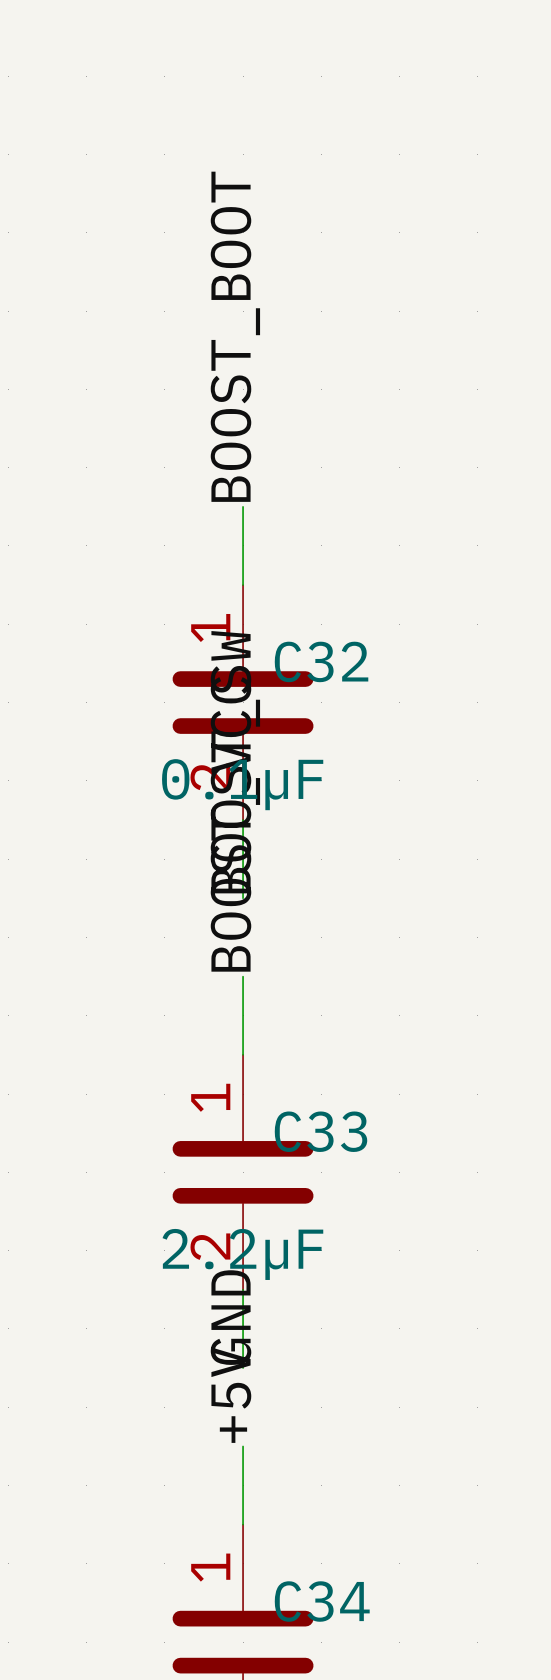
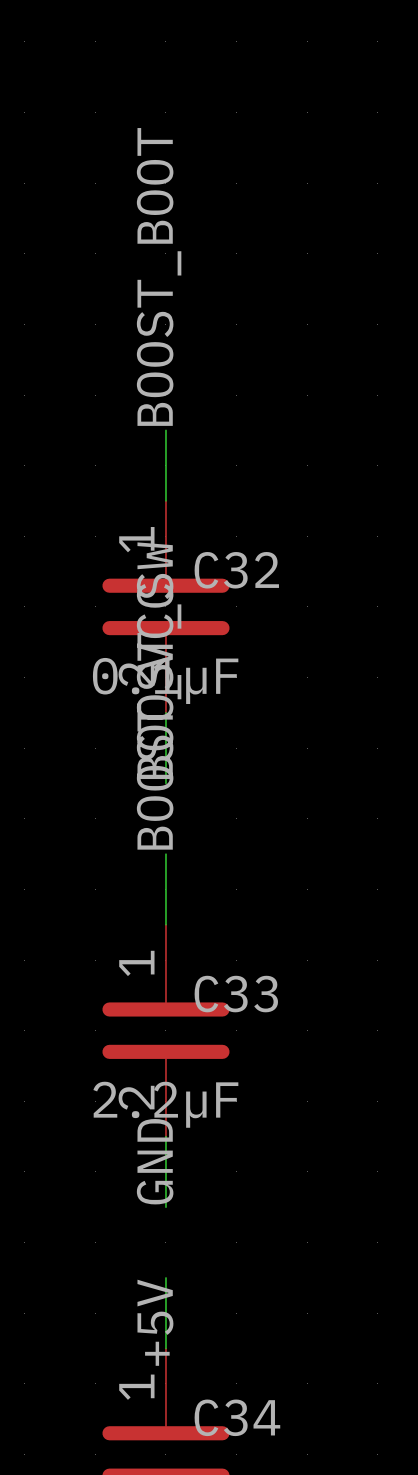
label position: +5V (231, 1395) -> +5V (155, 1322)

